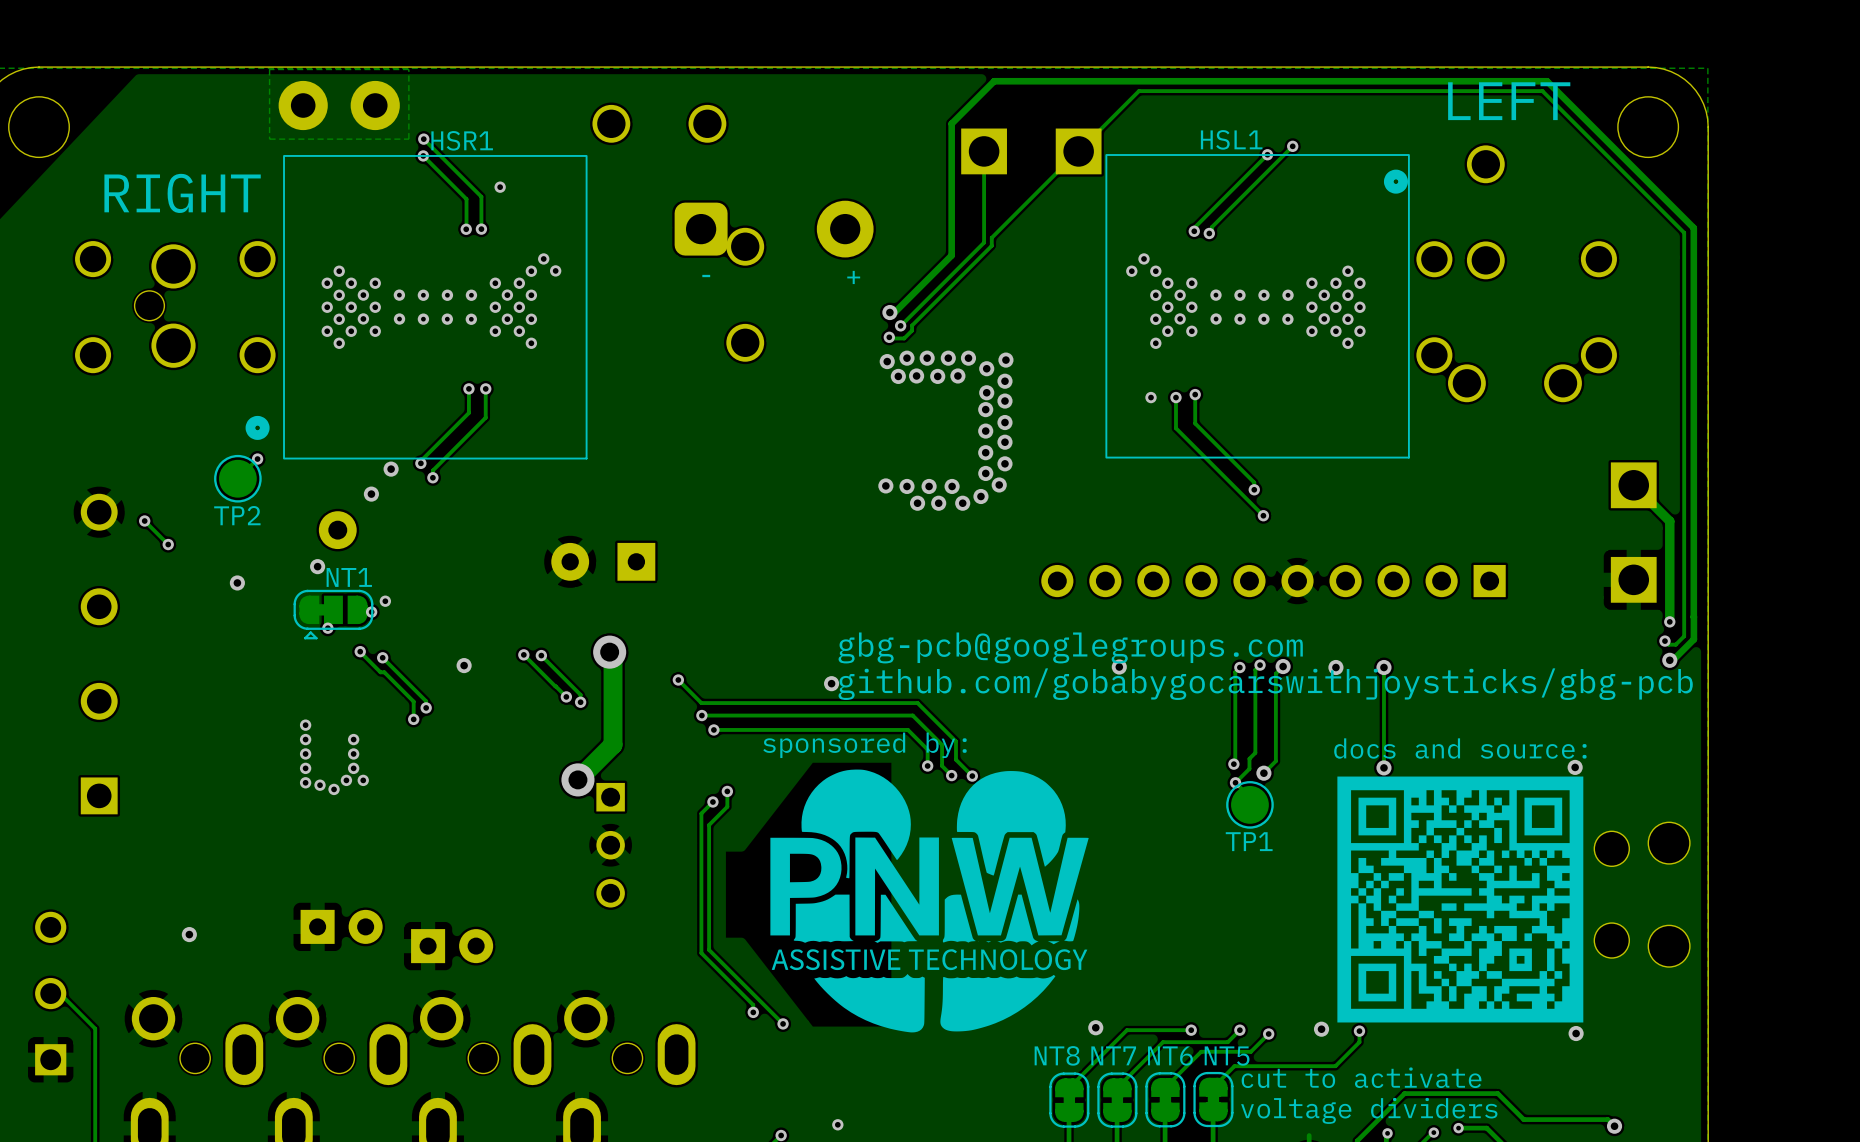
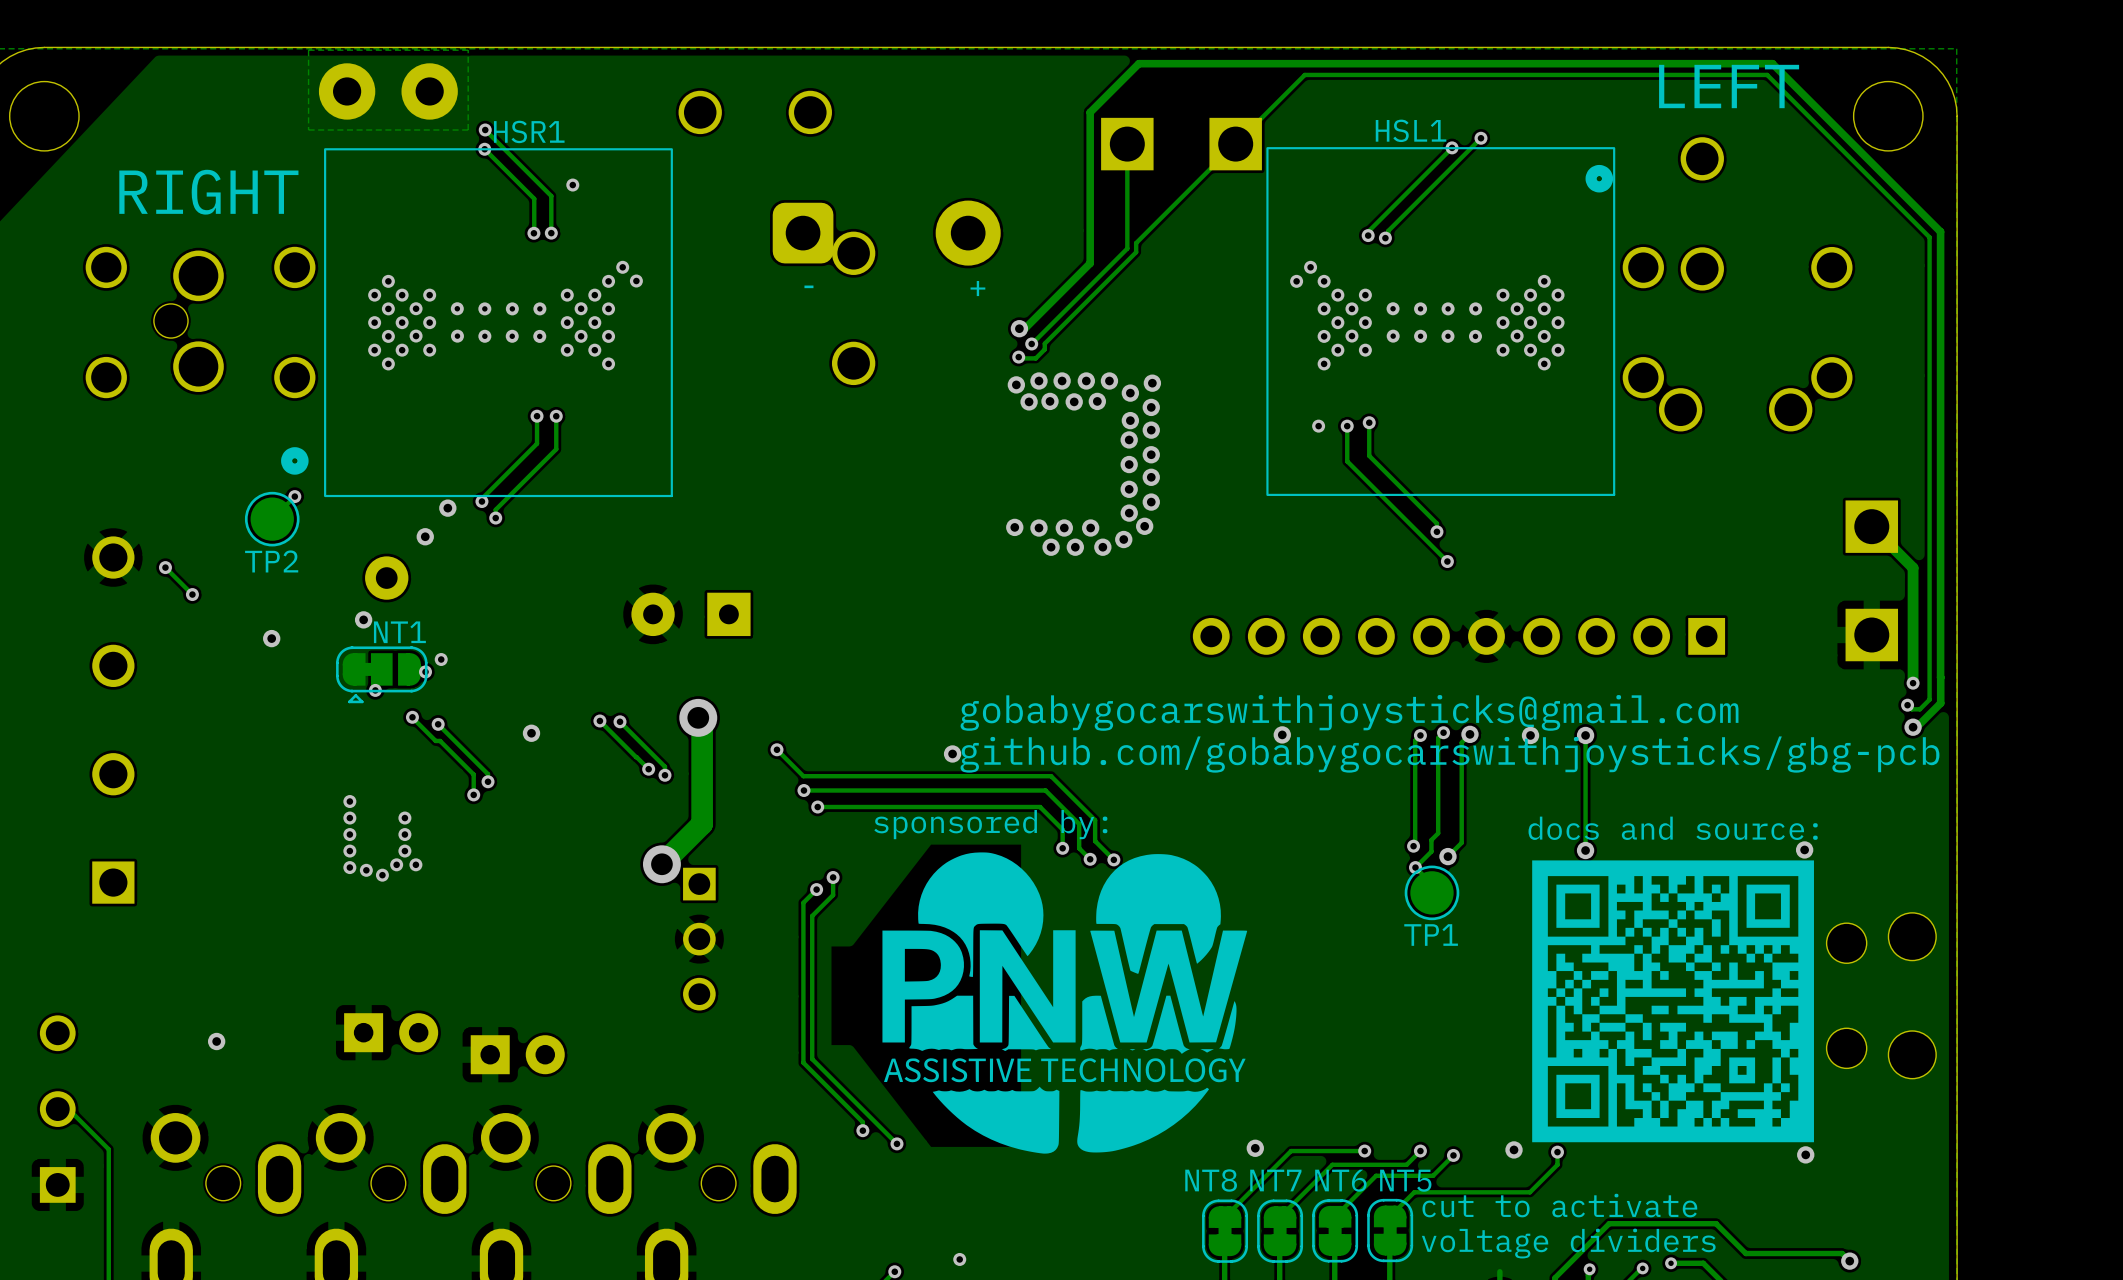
text: gbg-pcb@googlegroups.com (1070, 647) -> gobabygocarswithjoysticks@gmail.com (1349, 712)

